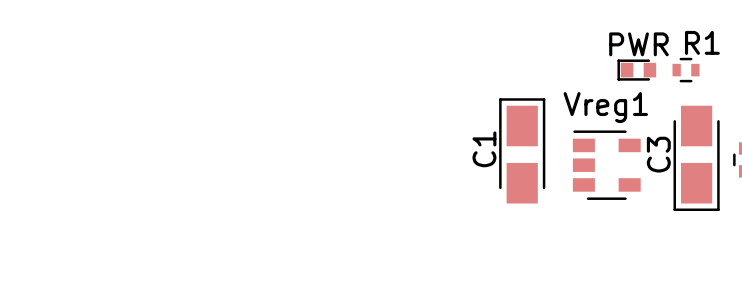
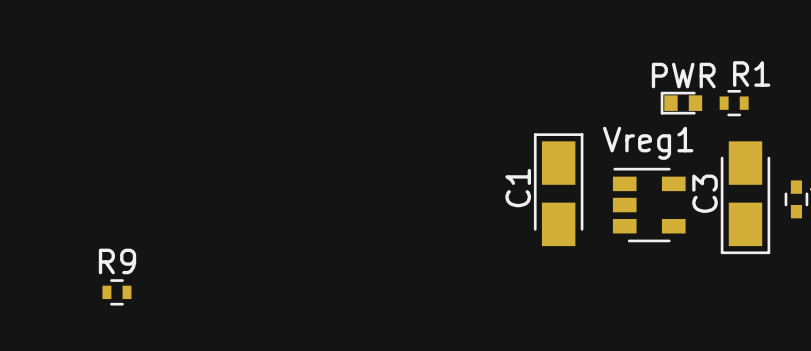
R9: none -> (116, 292)

